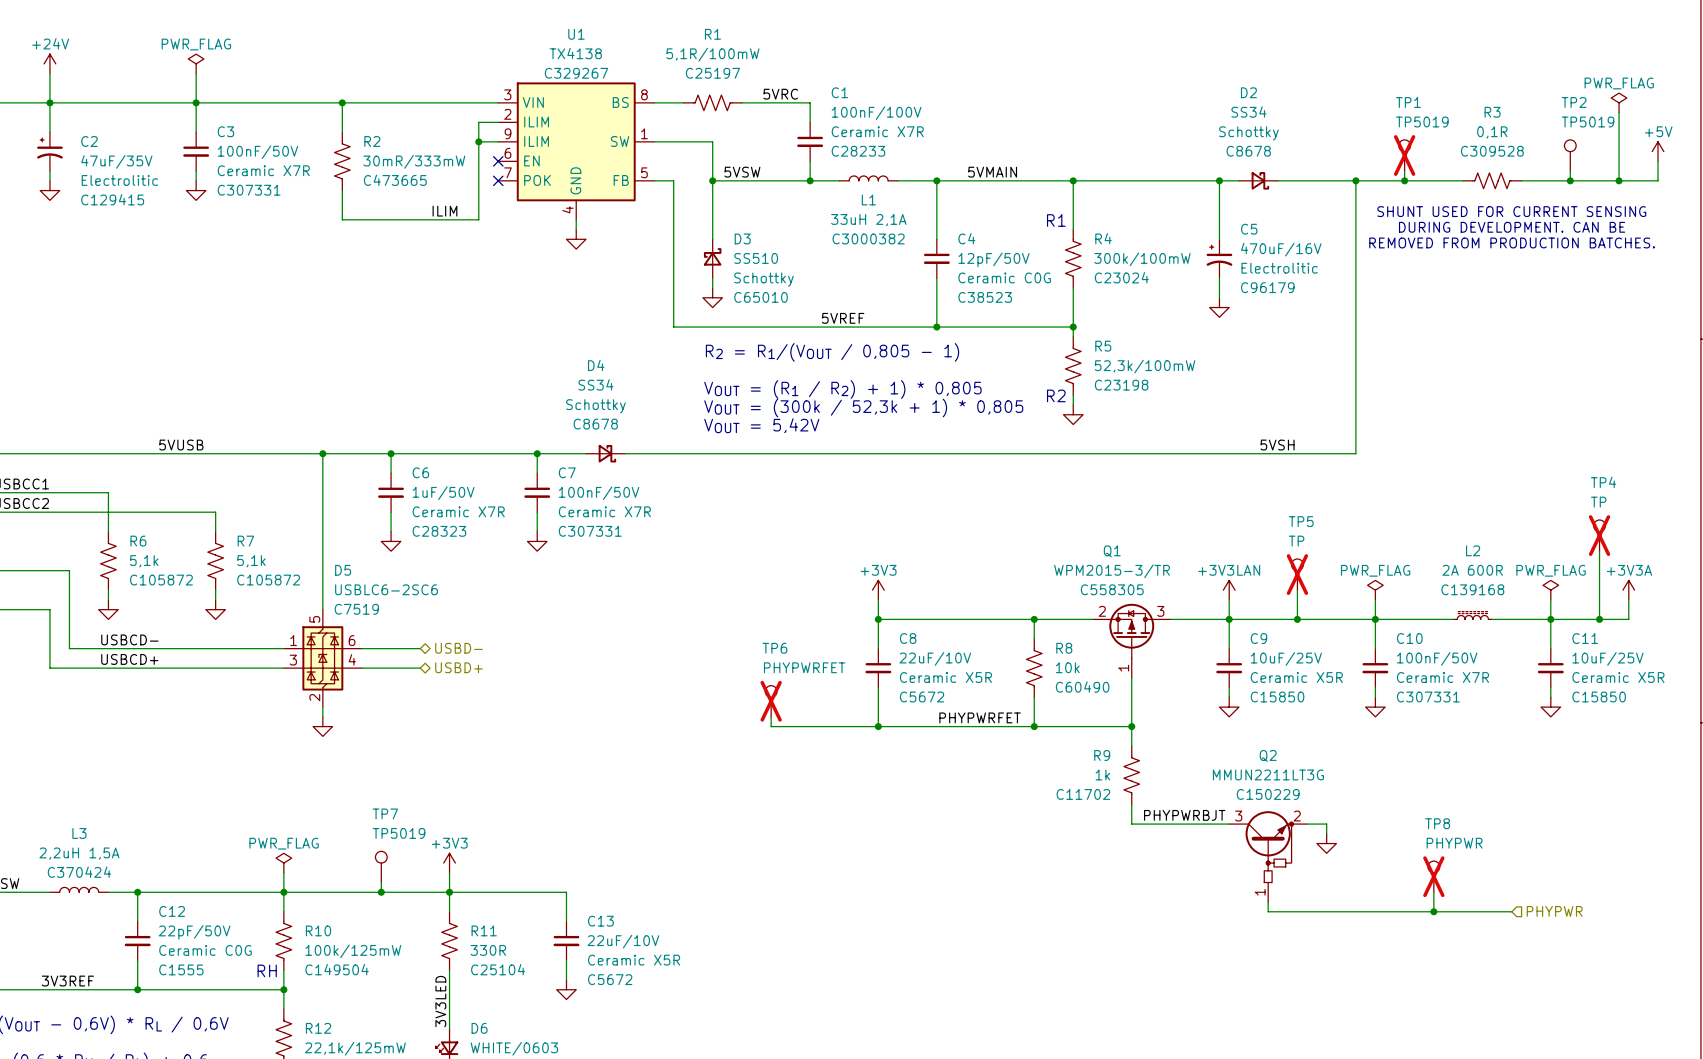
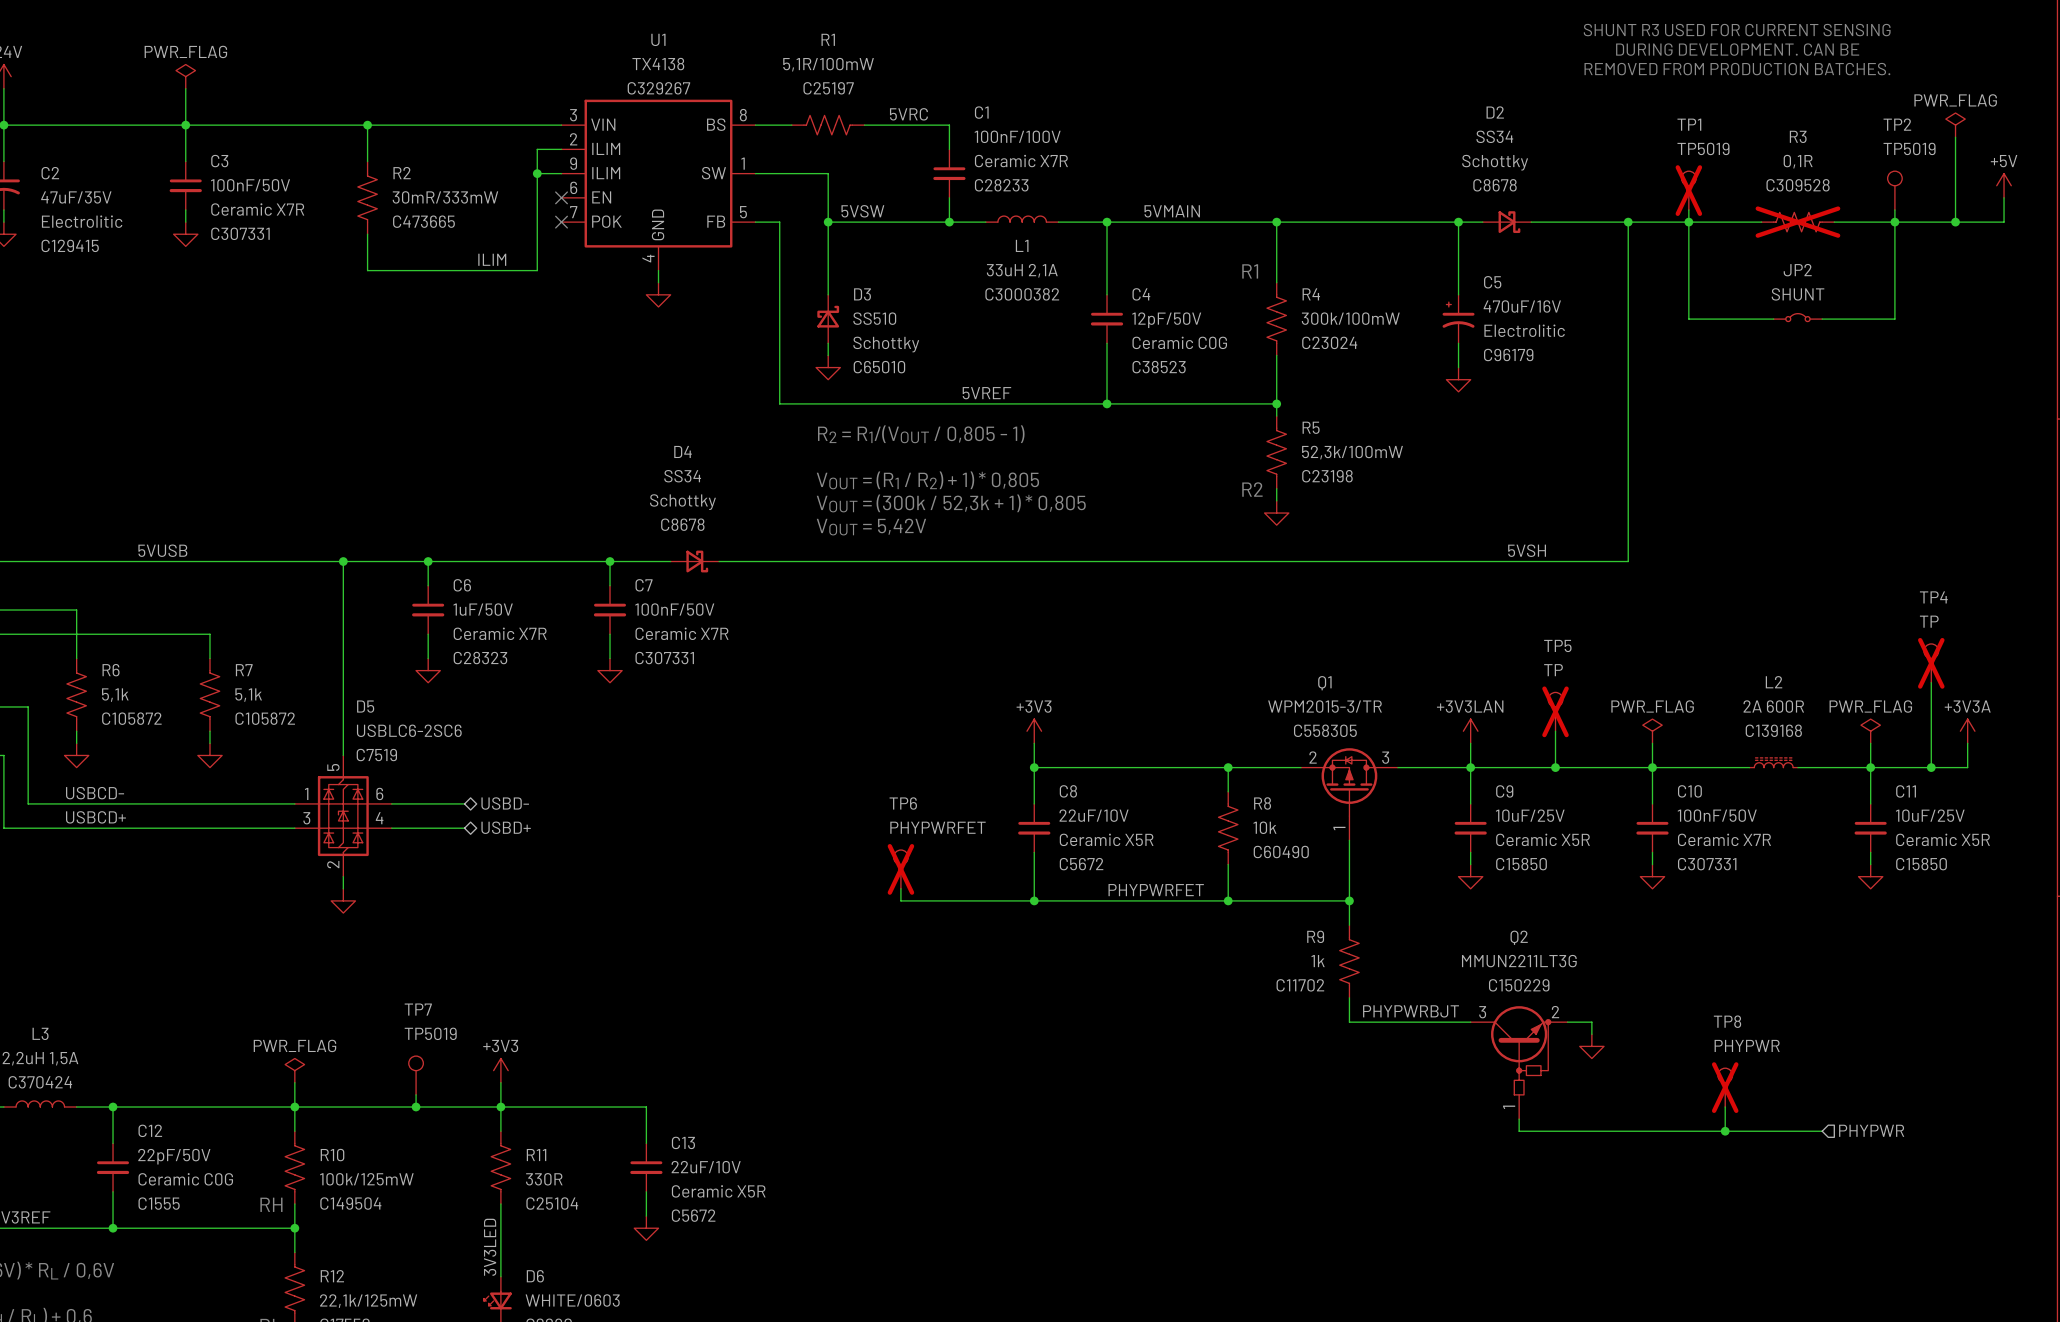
text: none -> SHUNT R3 USED FOR CURRENT SENSING (1737, 30)
text: none -> DURING DEVELOPMENT. CAN BE (1737, 49)
text: none -> REMOVED FROM PRODUCTION BATCHES. (1737, 69)
wire: none -> (1688, 222) (1688, 319) (1773, 319)
R3 do-not-place cross: none -> (1797, 222)
wire: none -> (1894, 222) (1894, 319) (1822, 319)
text: SHUNT USED FOR CURRENT SENSING (1511, 211) -> none
text: DURING DEVELOPMENT. CAN BE (1512, 227) -> none
text: REMOVED FROM PRODUCTION BATCHES. (1512, 242) -> none
JP2: none -> SHUNT (1797, 317)

